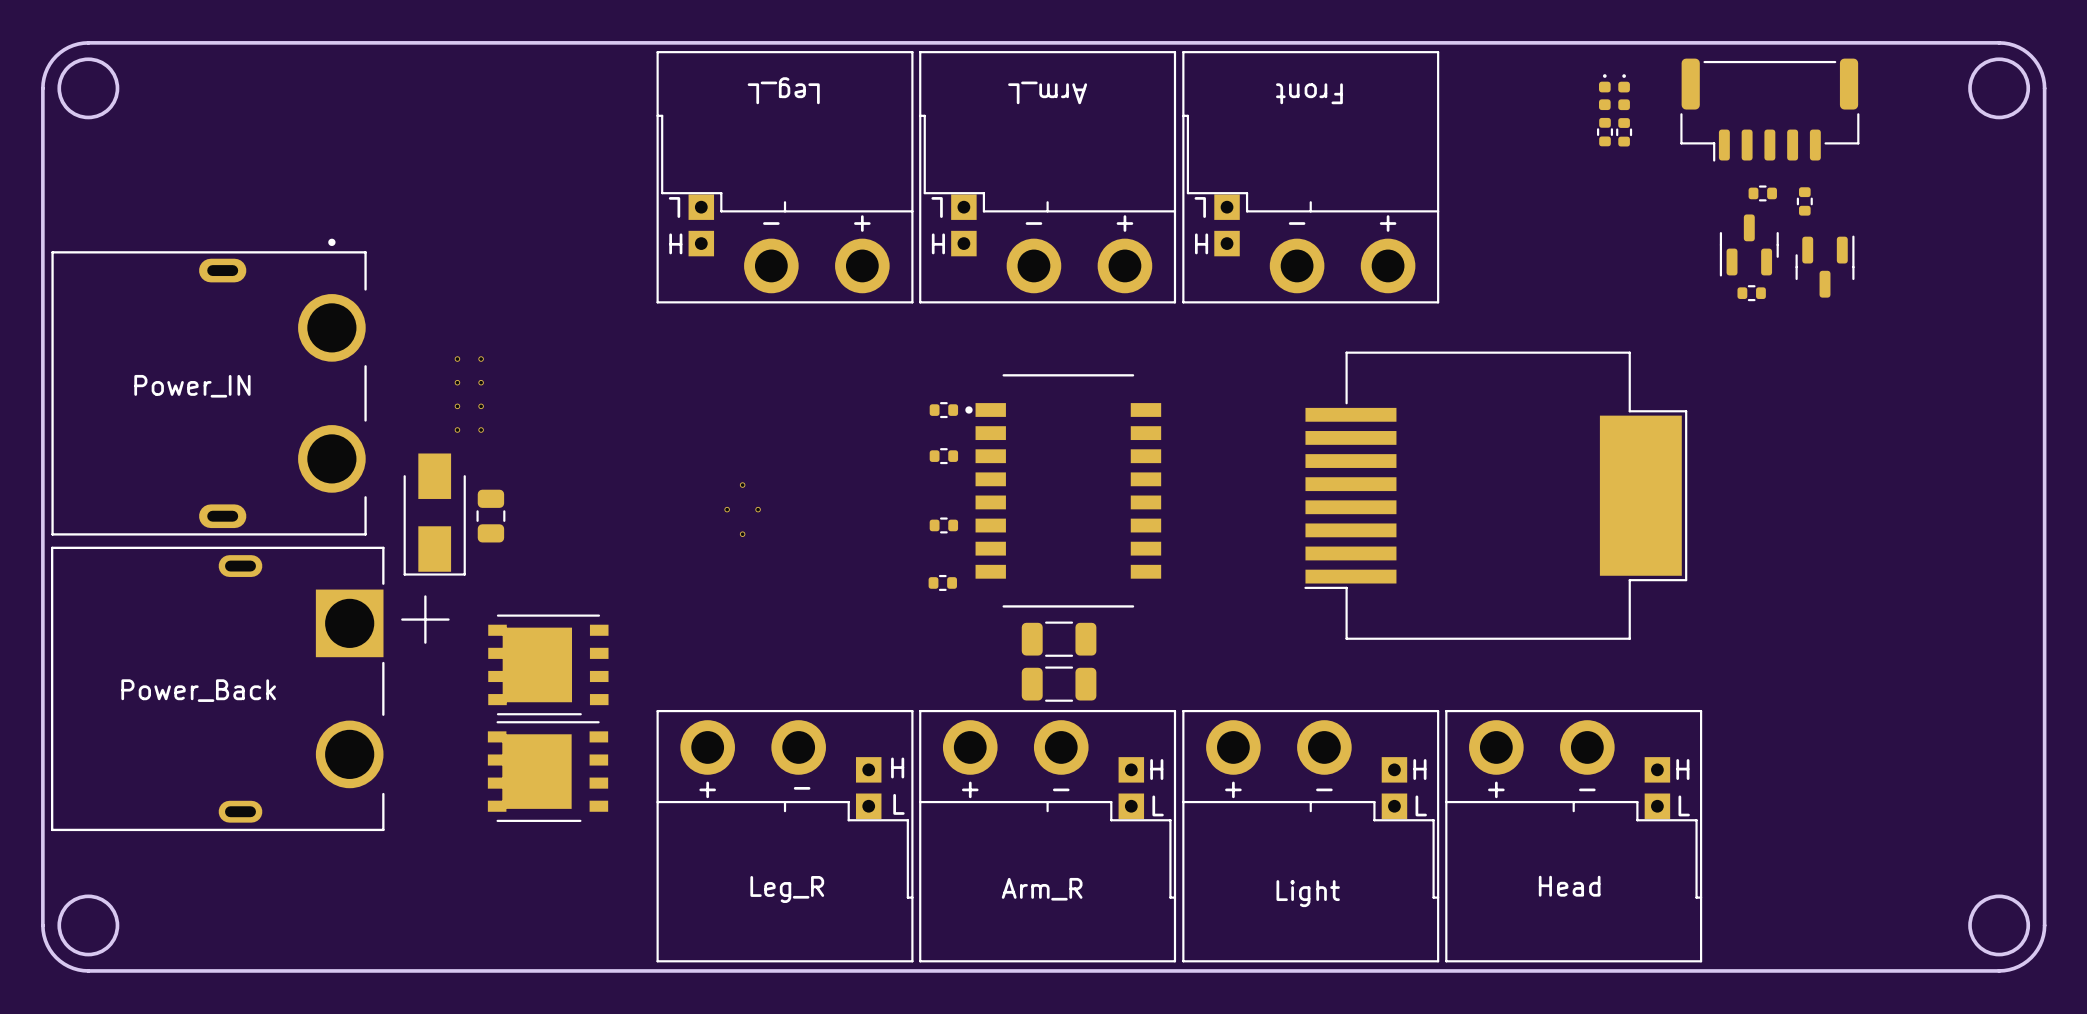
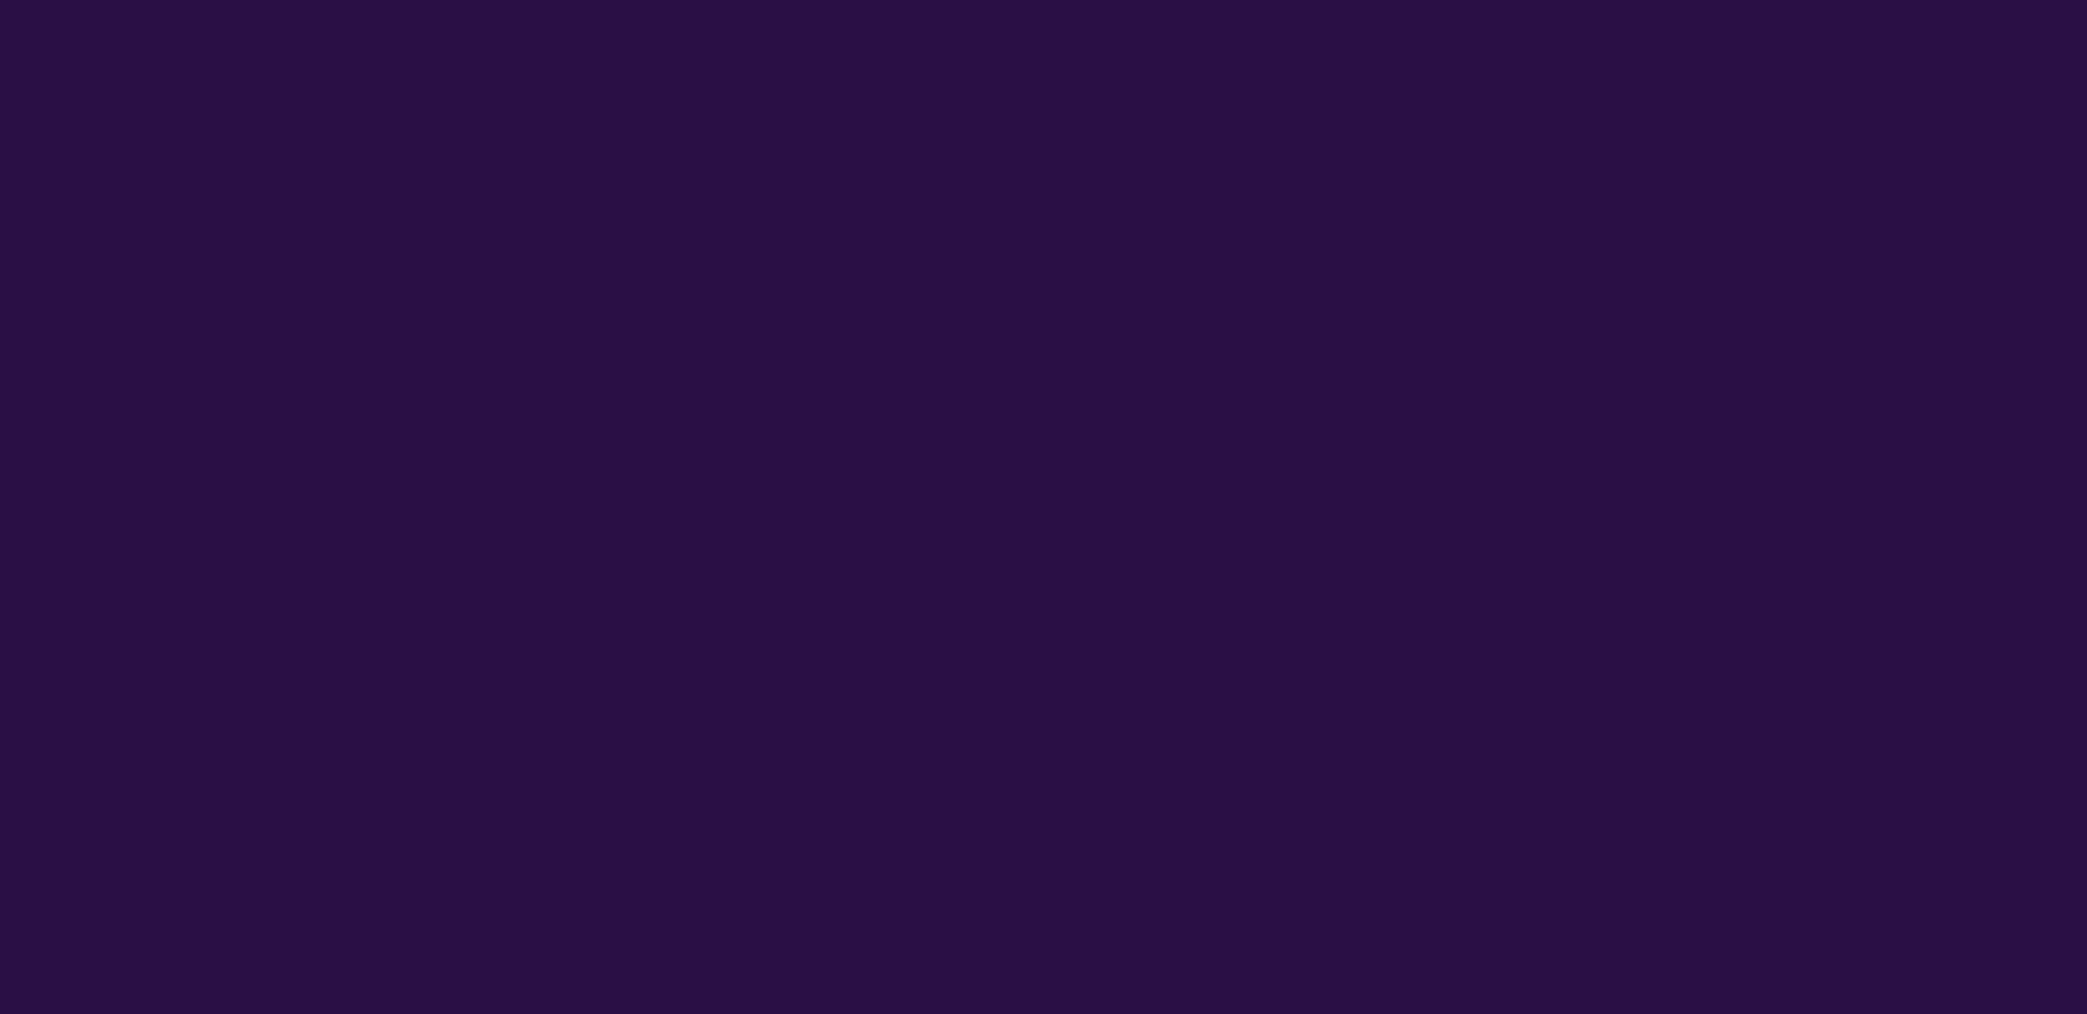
board edge: (88, 42) (1999, 42) (2018, 47) (2027, 52) (2037, 64) (2042, 73) (2044, 88) (2044, 925) (2040, 945) (2034, 953) (2023, 963) (2014, 968) (1999, 970) (88, 970) (68, 966) (60, 961) (49, 949) (44, 935) (42, 925) (42, 88) (45, 73) (56, 56) (68, 47) (88, 42) -> none
round board edge: [57, 57, 120, 120] -> none
round board edge: [1968, 57, 2031, 120] -> none
part: (1604, 92) -> none
part: (1624, 92) -> none
part: (1769, 110) -> none
part: (1605, 132) -> none
part: (1624, 132) -> none
part: Leg_L (785, 177) -> none
part: Arm_L (1047, 177) -> none
part: Front (1310, 177) -> none
part: (1762, 193) -> none
part: (1804, 201) -> none
part: (1749, 245) -> none
part: (1825, 266) -> none
part: (1751, 293) -> none
part: Power_IN (209, 387) -> none
part: (469, 394) -> none
part: (943, 410) -> none
part: (943, 456) -> none
part: (1063, 490) -> none
part: (1495, 495) -> none
part: (742, 509) -> none
part: (434, 514) -> none
part: (490, 516) -> none
part: (943, 525) -> none
part: (942, 582) -> none
part: (1059, 639) -> none
part: (548, 664) -> none
part: (1059, 684) -> none
part: Power_Back (250, 688) -> none
part: (548, 771) -> none
part: Leg_R (785, 836) -> none
part: Arm_R (1047, 836) -> none
part: Light (1310, 836) -> none
part: Head (1573, 836) -> none
round board edge: [57, 894, 120, 957] -> none
round board edge: [1968, 894, 2031, 957] -> none

